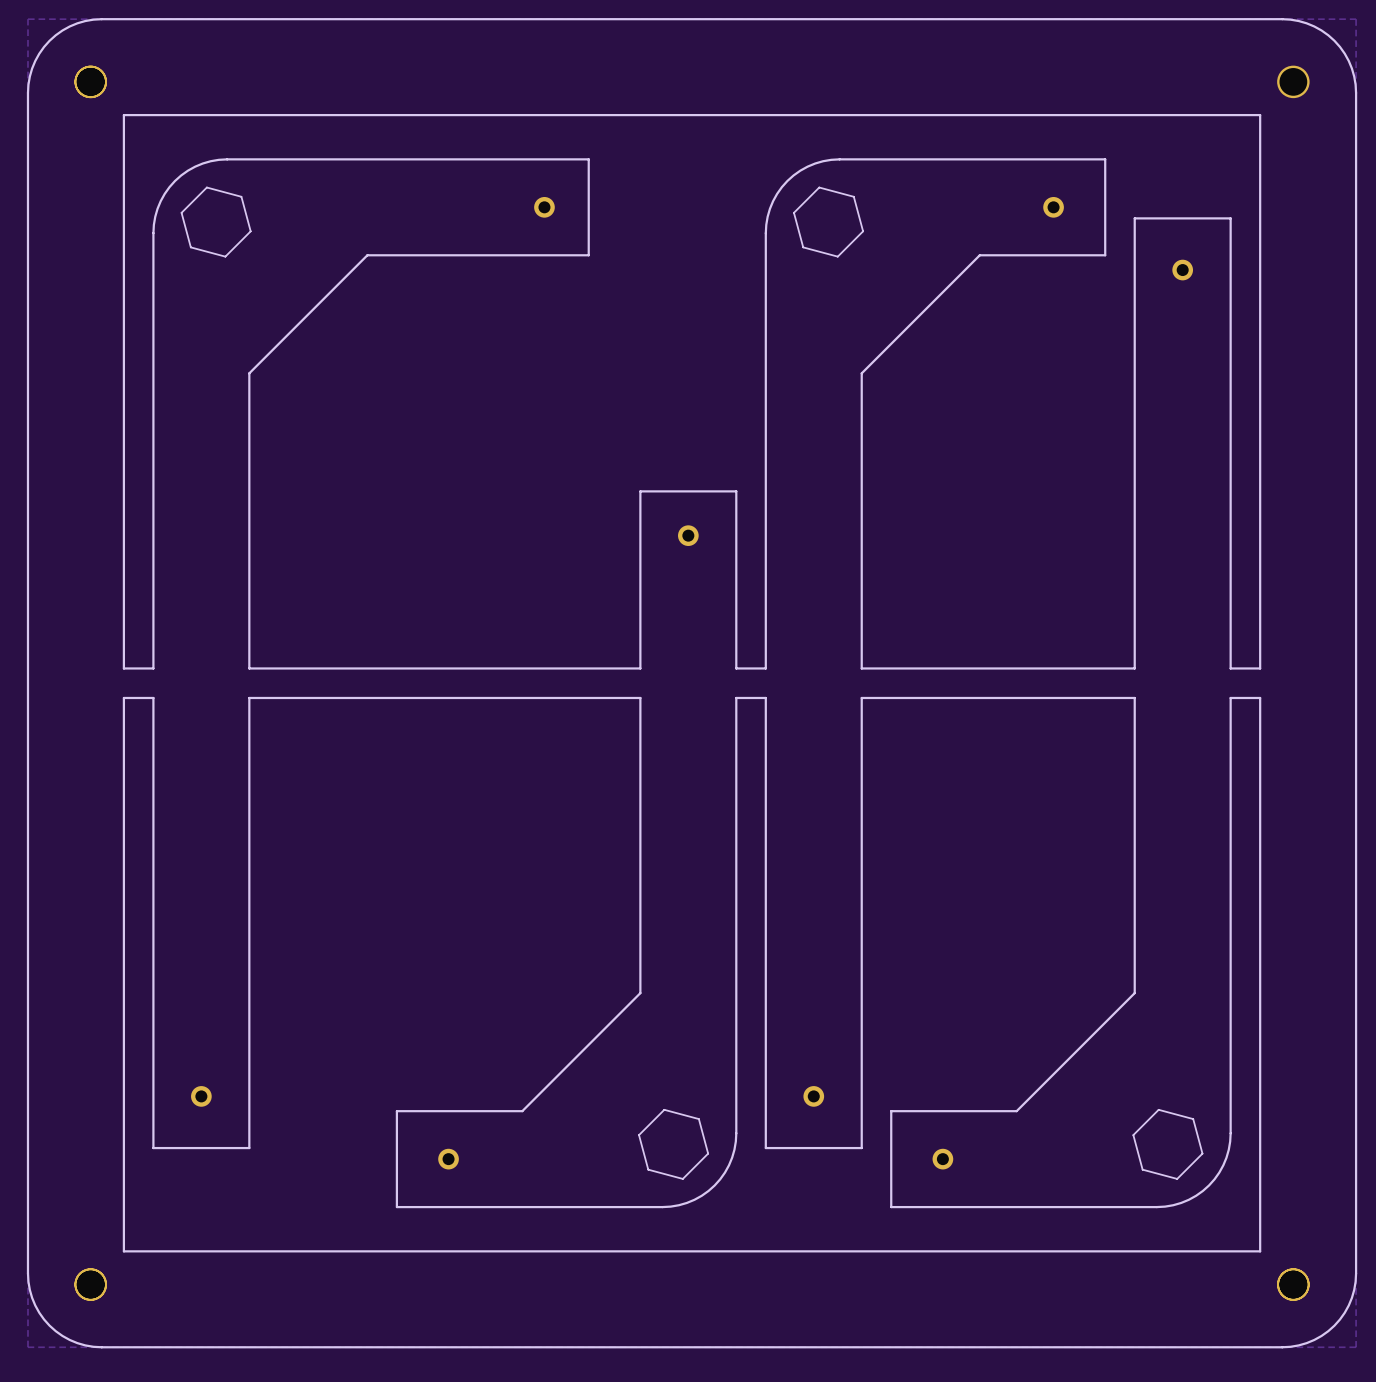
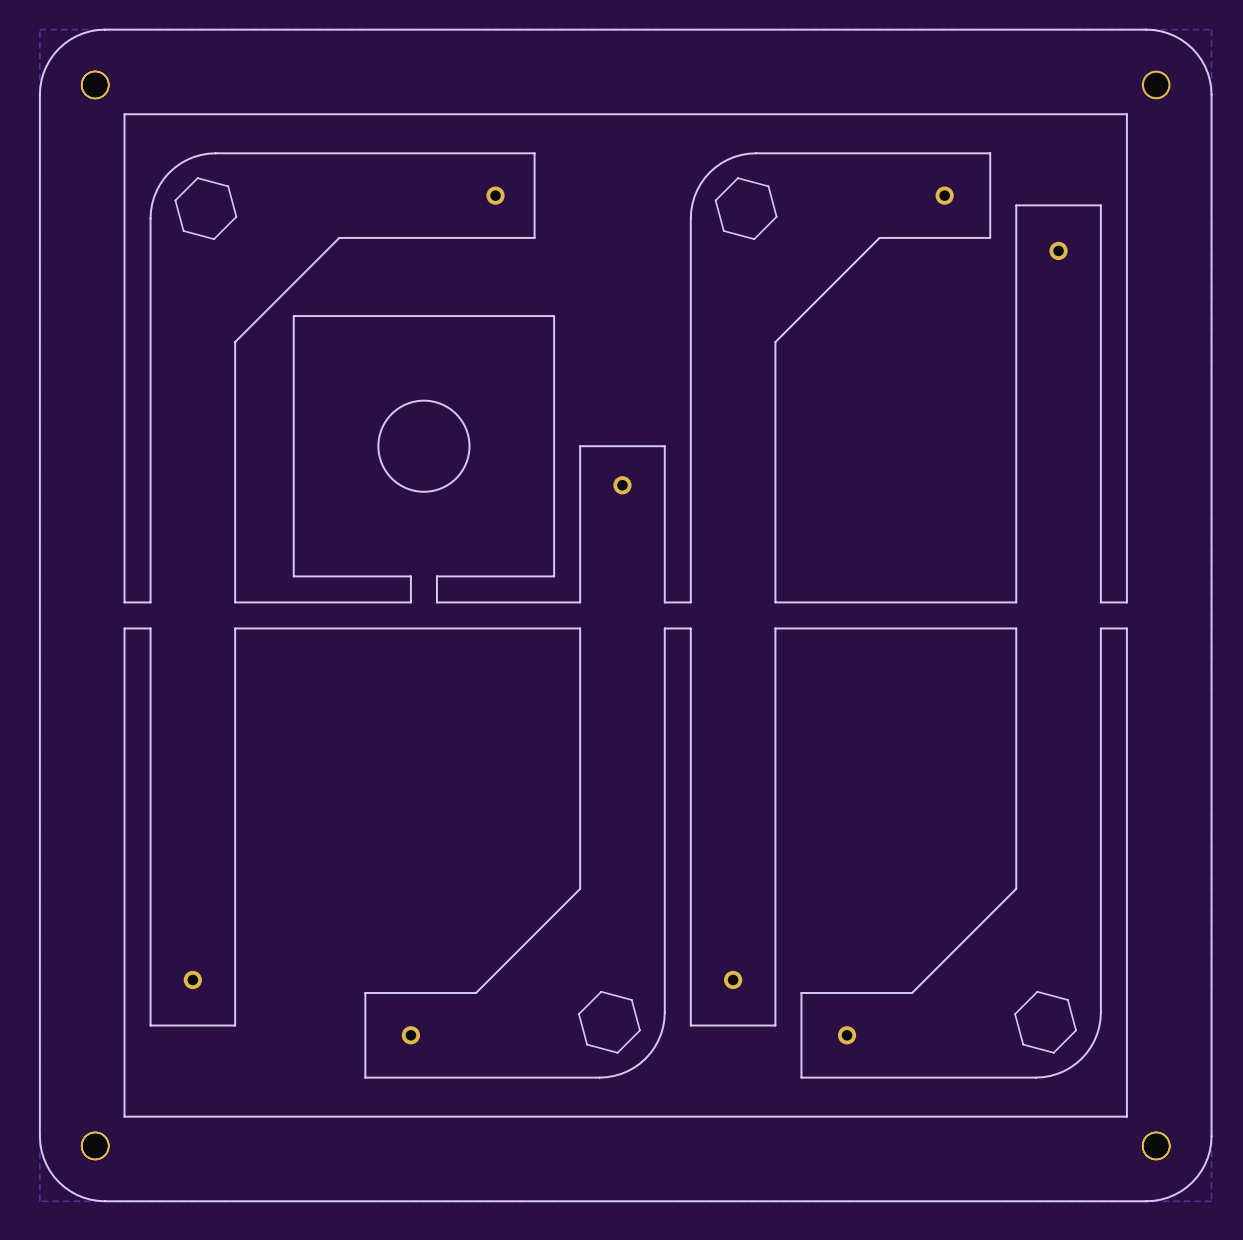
round board edge: none -> [377, 399, 471, 493]
board edge: (448, 668) (478, 668) -> (410, 602) (410, 576) (293, 576) (293, 316) (554, 316) (554, 576) (436, 576) (436, 602)

